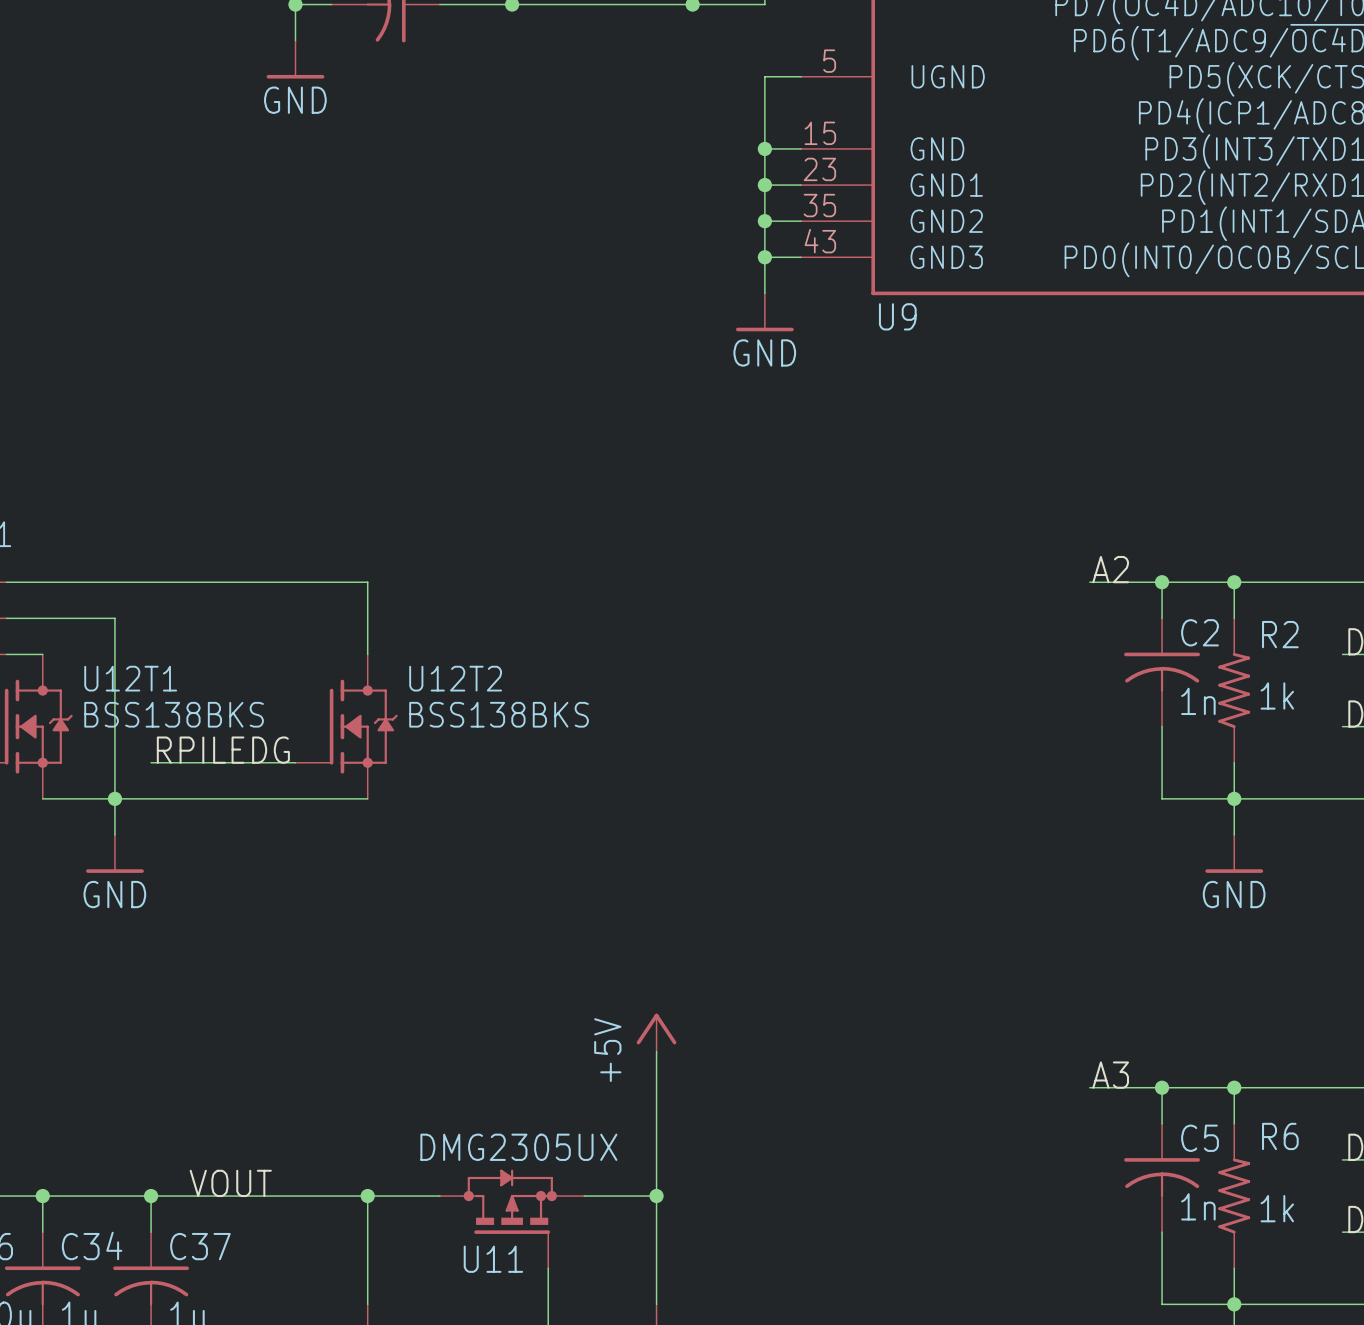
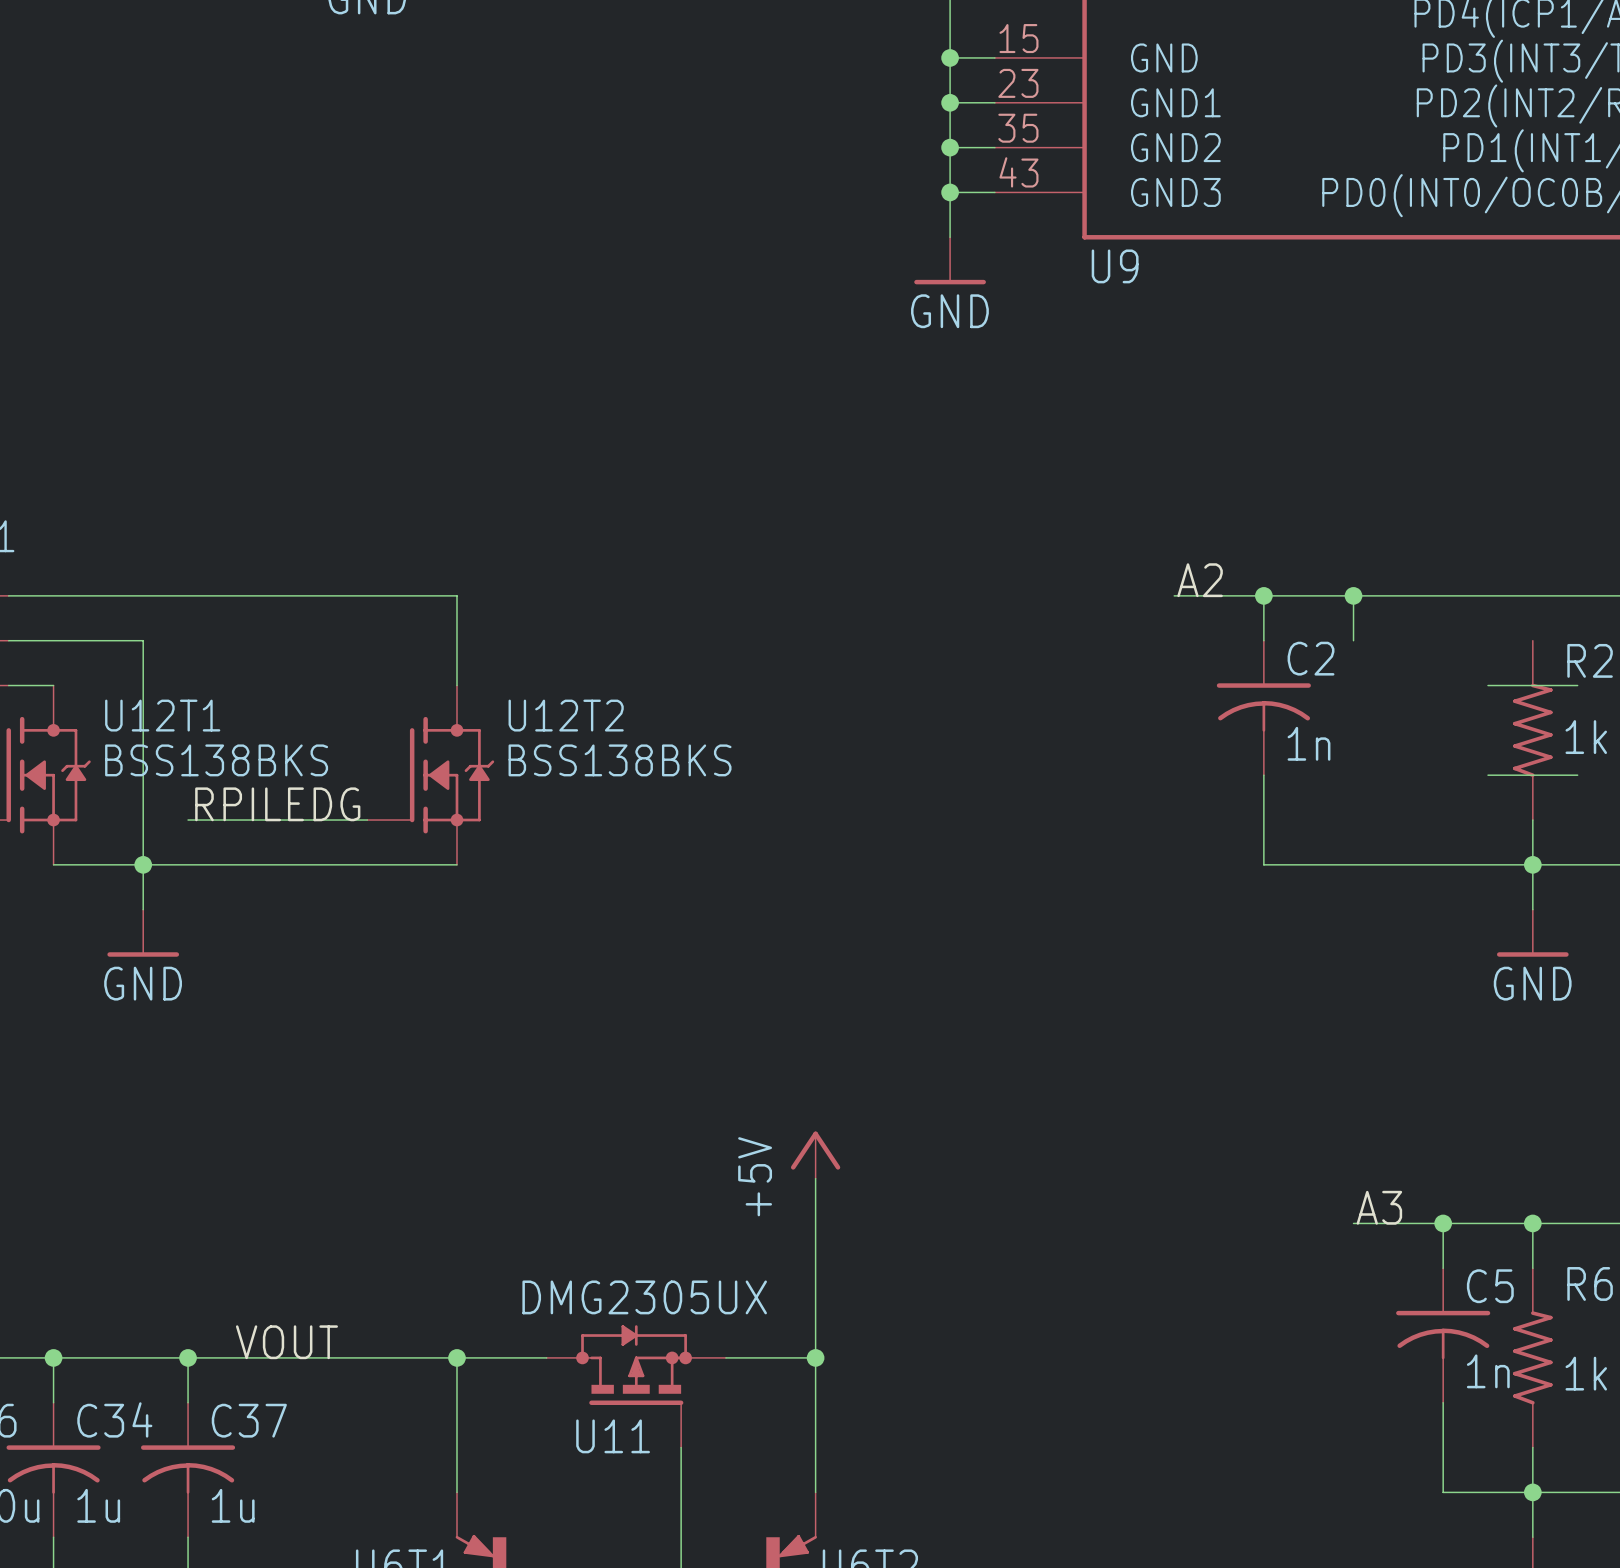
label position: A2 (1110, 569) -> A2 (1200, 580)
wire: none -> (1174, 595) (1353, 595) (1353, 640)
junction: none -> (1263, 595)
junction: none -> (1353, 595)
wire: (1162, 582) (1162, 618) -> (1263, 595) (1263, 640)
junction: (1162, 582) -> none
wire: (1234, 582) (1234, 618) -> none
junction: (1234, 582) -> none
wire: none -> (1488, 685) (1577, 685)
C2 position: (1162, 672) -> (1263, 707)
wire: (1162, 726) (1162, 798) -> (1263, 775) (1263, 864) (1443, 864)
wire: none -> (1488, 775) (1577, 775)

